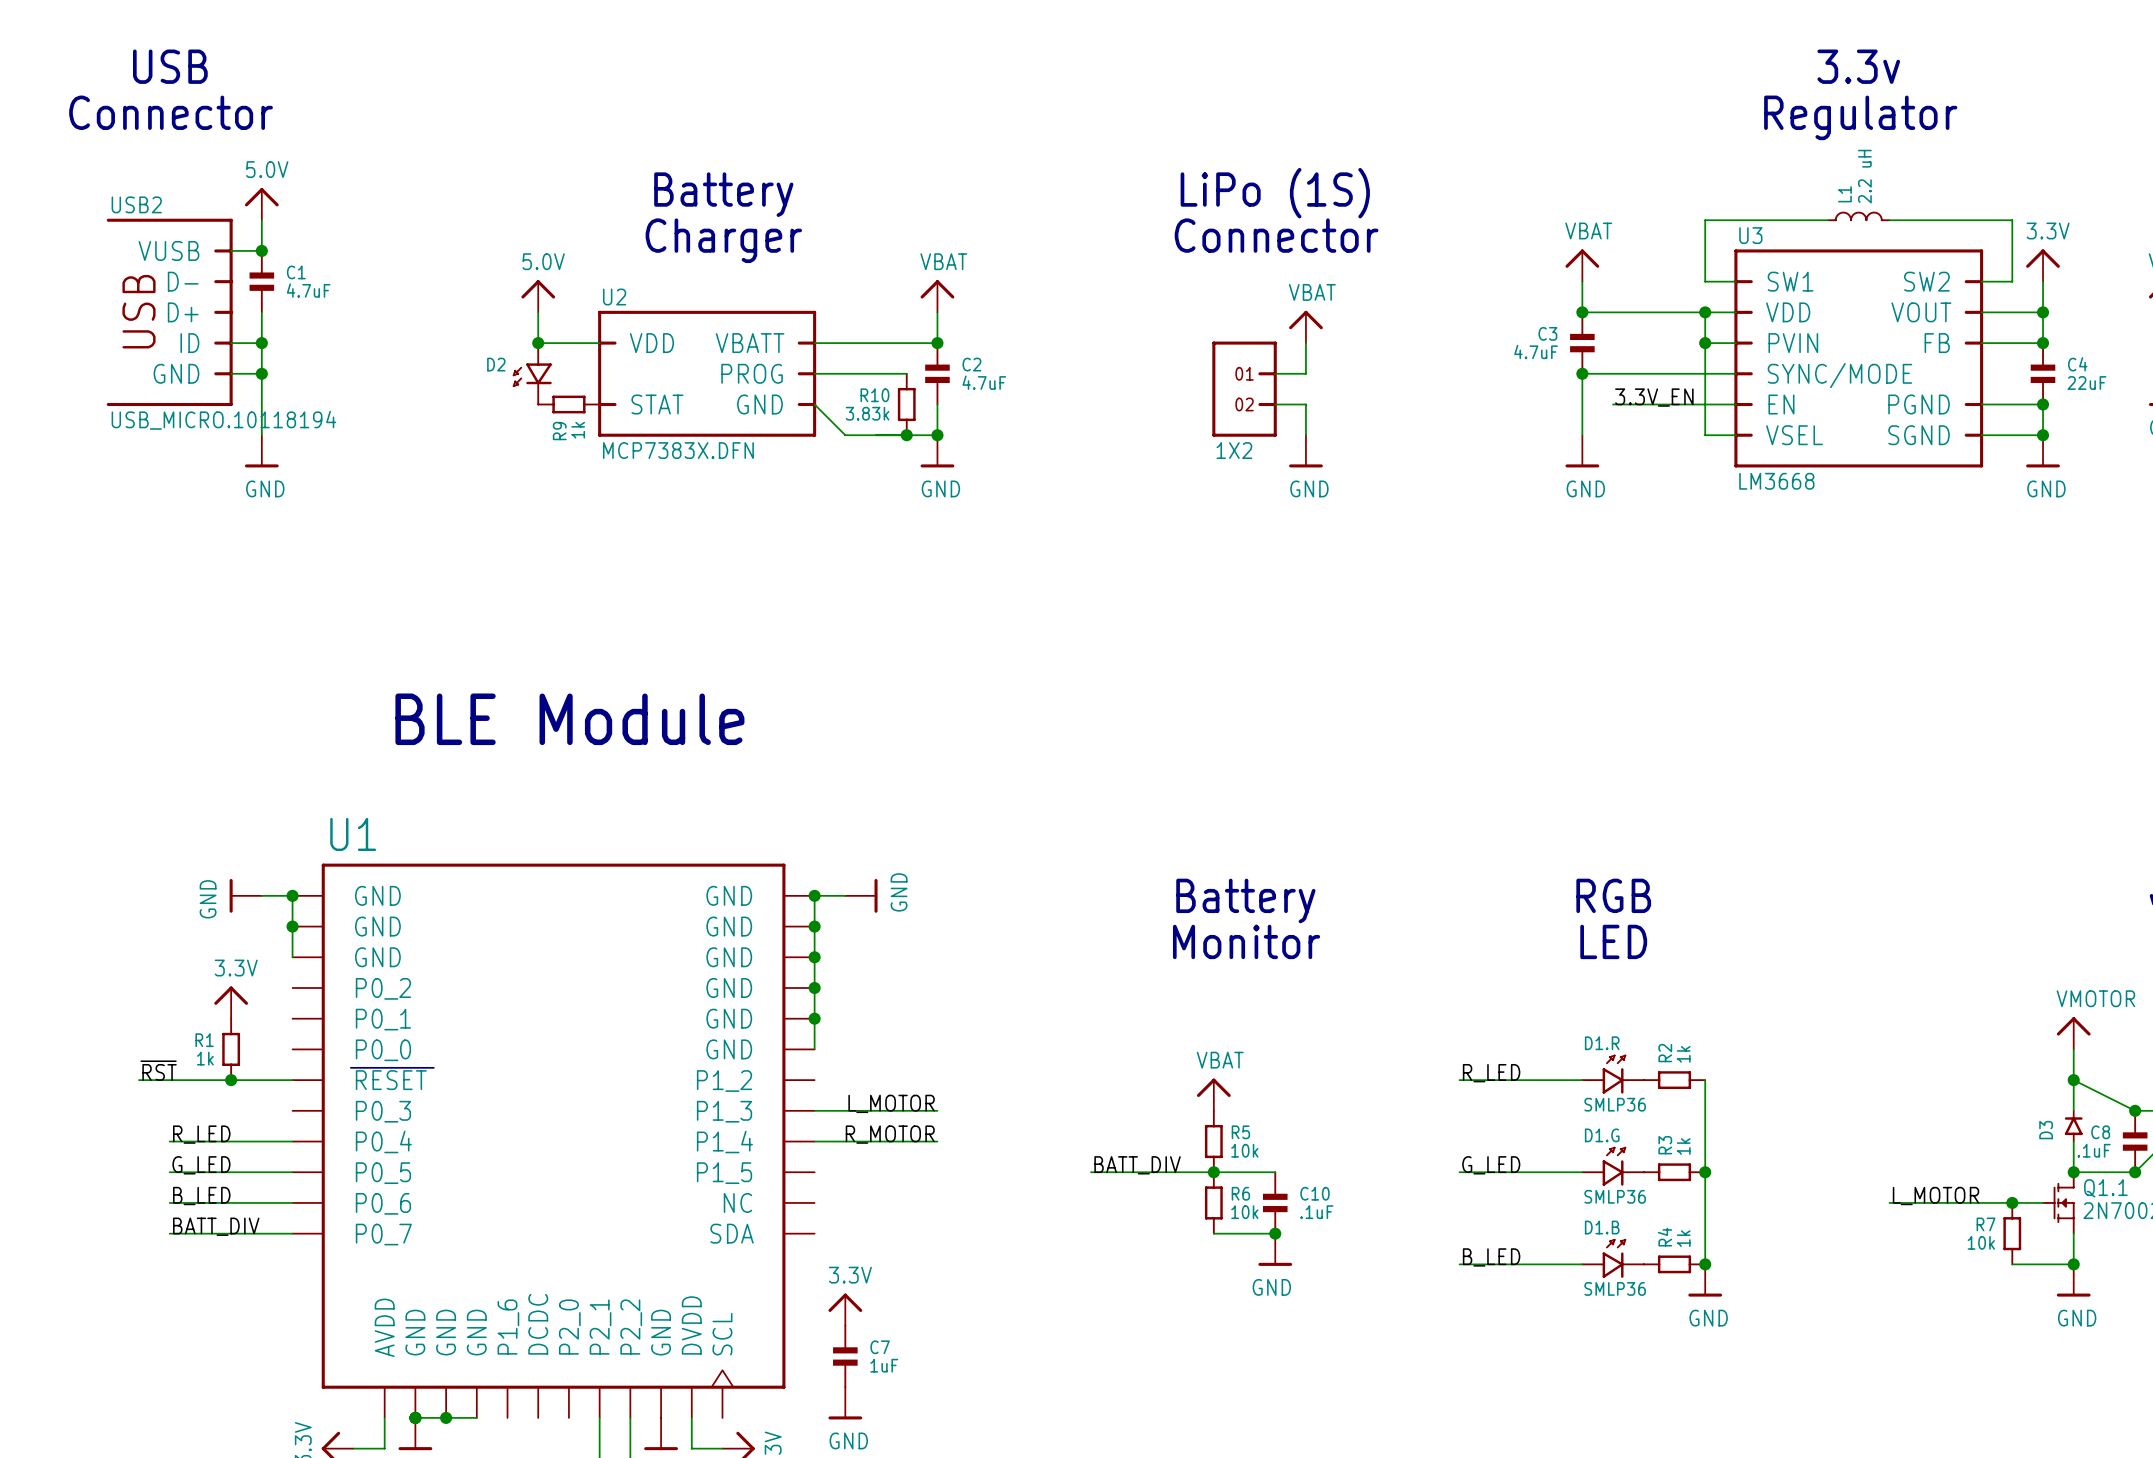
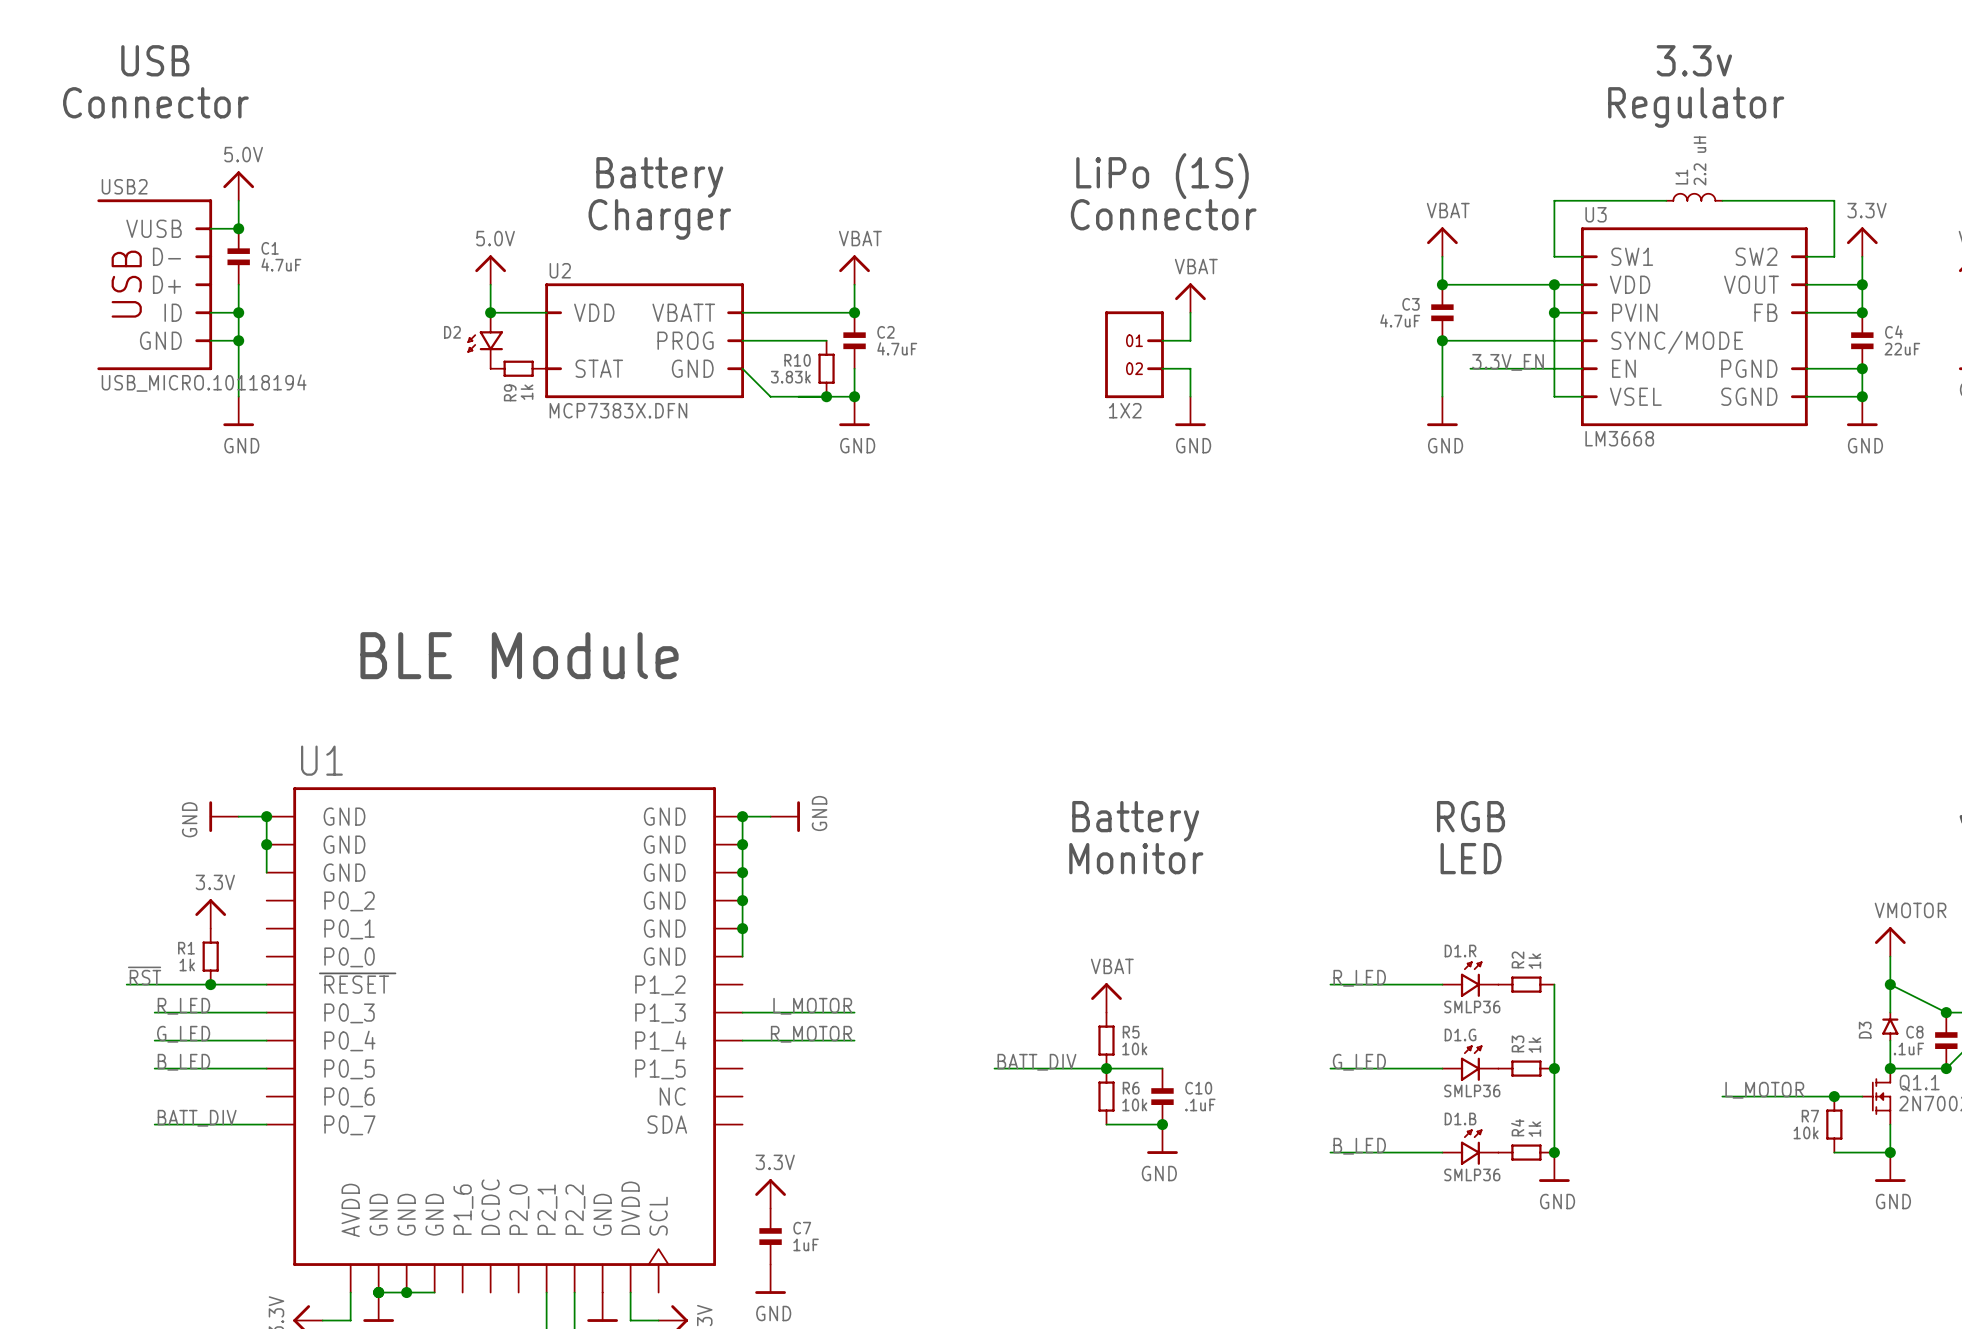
label: none -> R_LED (183, 1006)
label: R_LED (201, 1134) -> G_LED (183, 1034)
label: G_LED (201, 1165) -> B_LED (183, 1062)
label: B_LED (201, 1196) -> none
wire: (169, 1202) (292, 1202) -> (154, 1012) (266, 1012)

